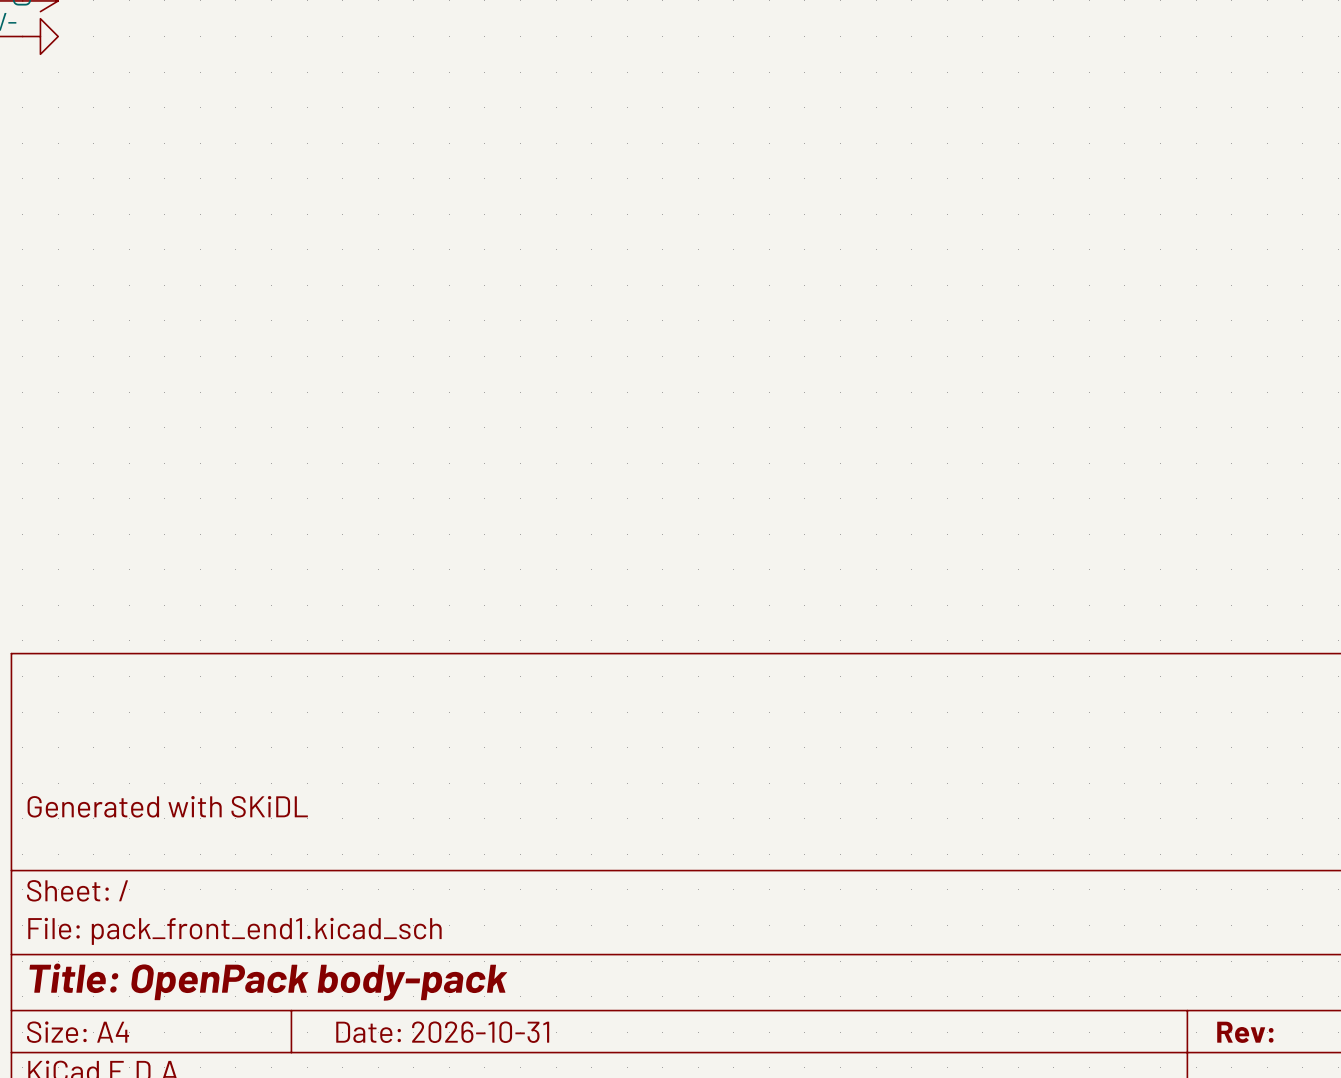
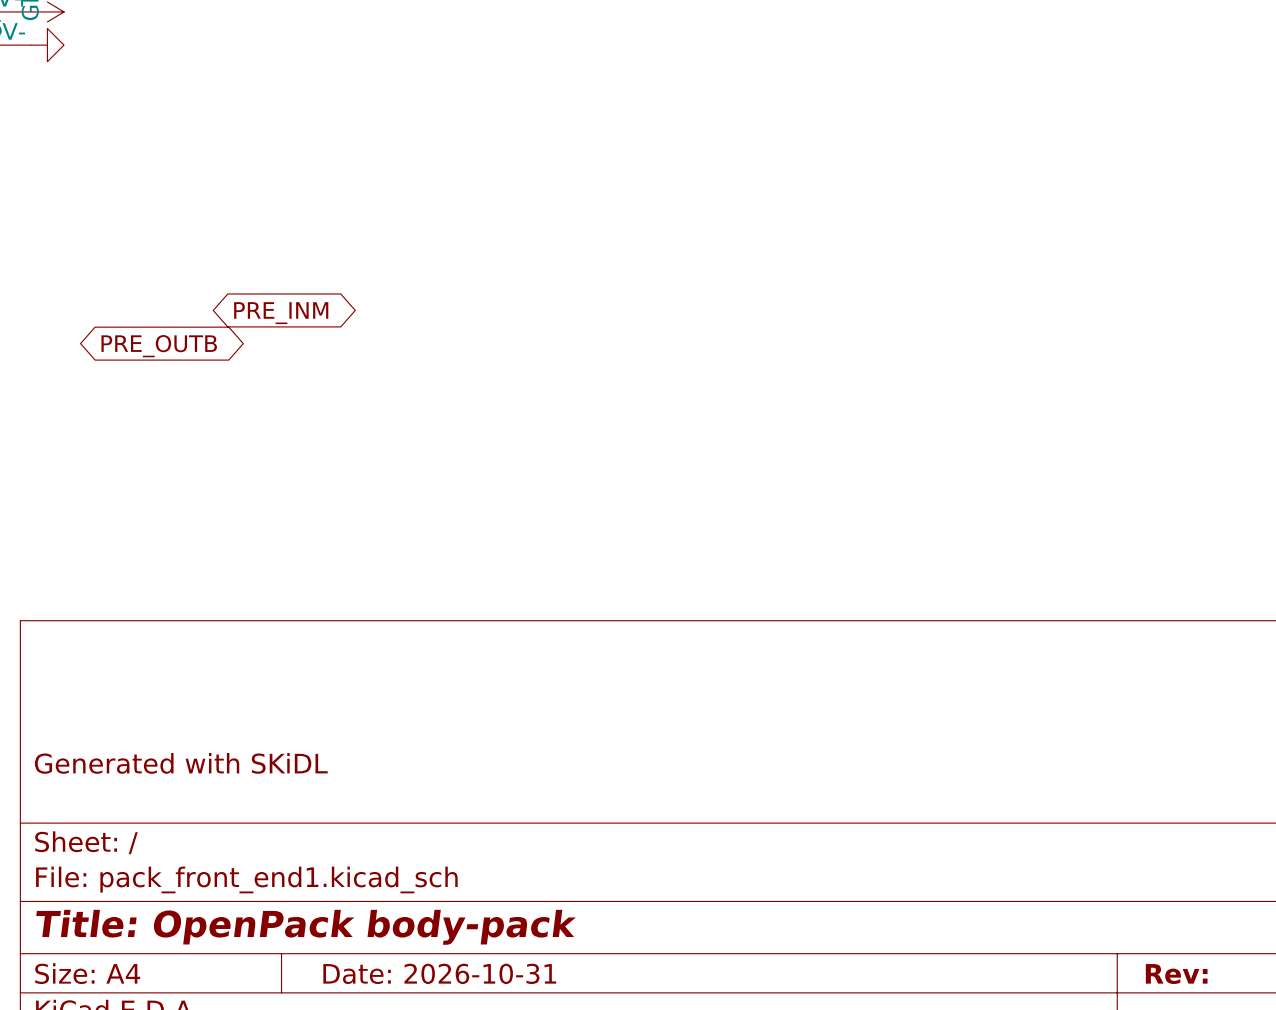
global label: none -> PRE_INM (281, 313)
global label: none -> PRE_OUTB (159, 346)

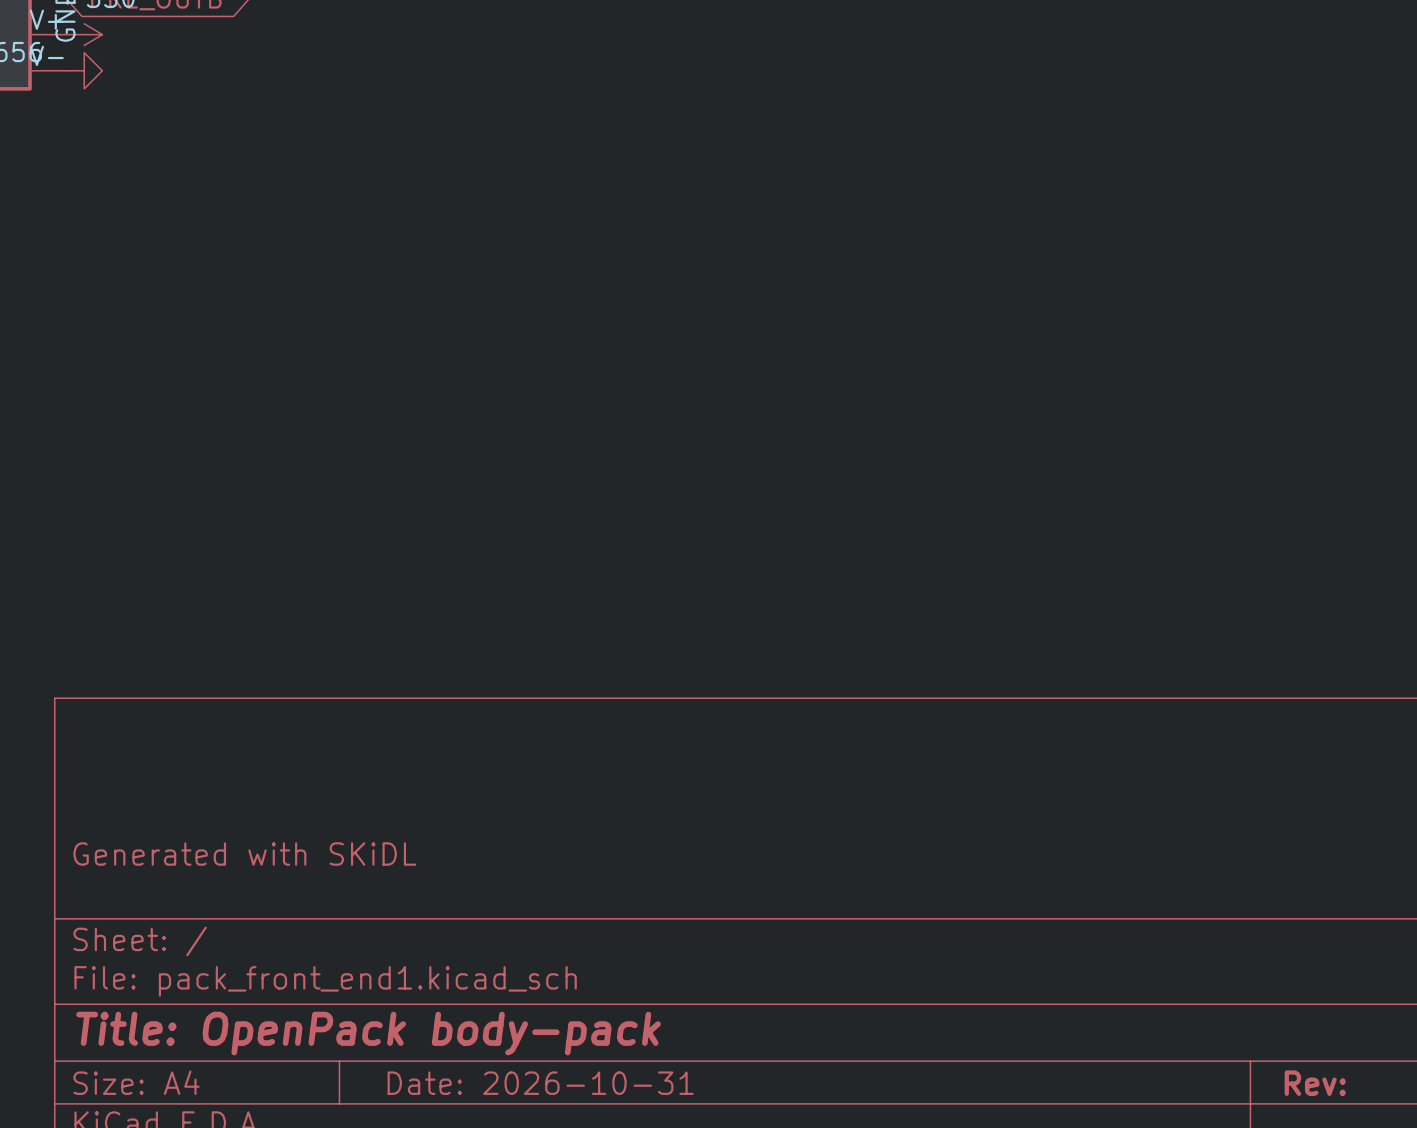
global label: PRE_INM (281, 313) -> none
global label: PRE_OUTB (159, 346) -> none

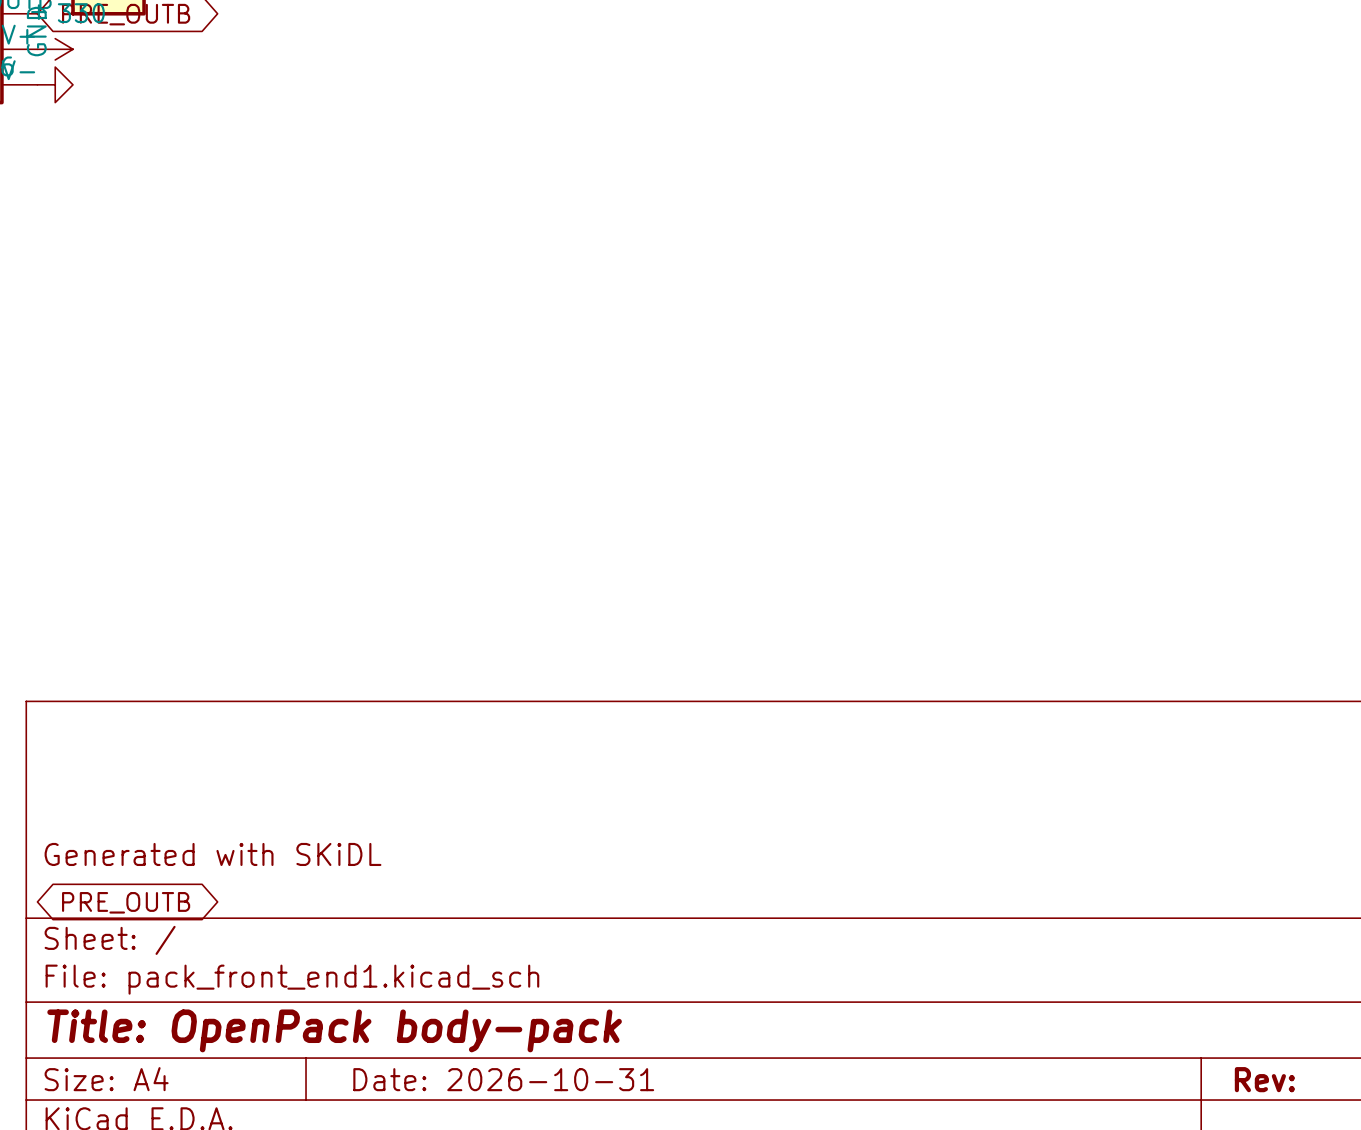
global label: none -> PRE_OUTB (126, 902)

